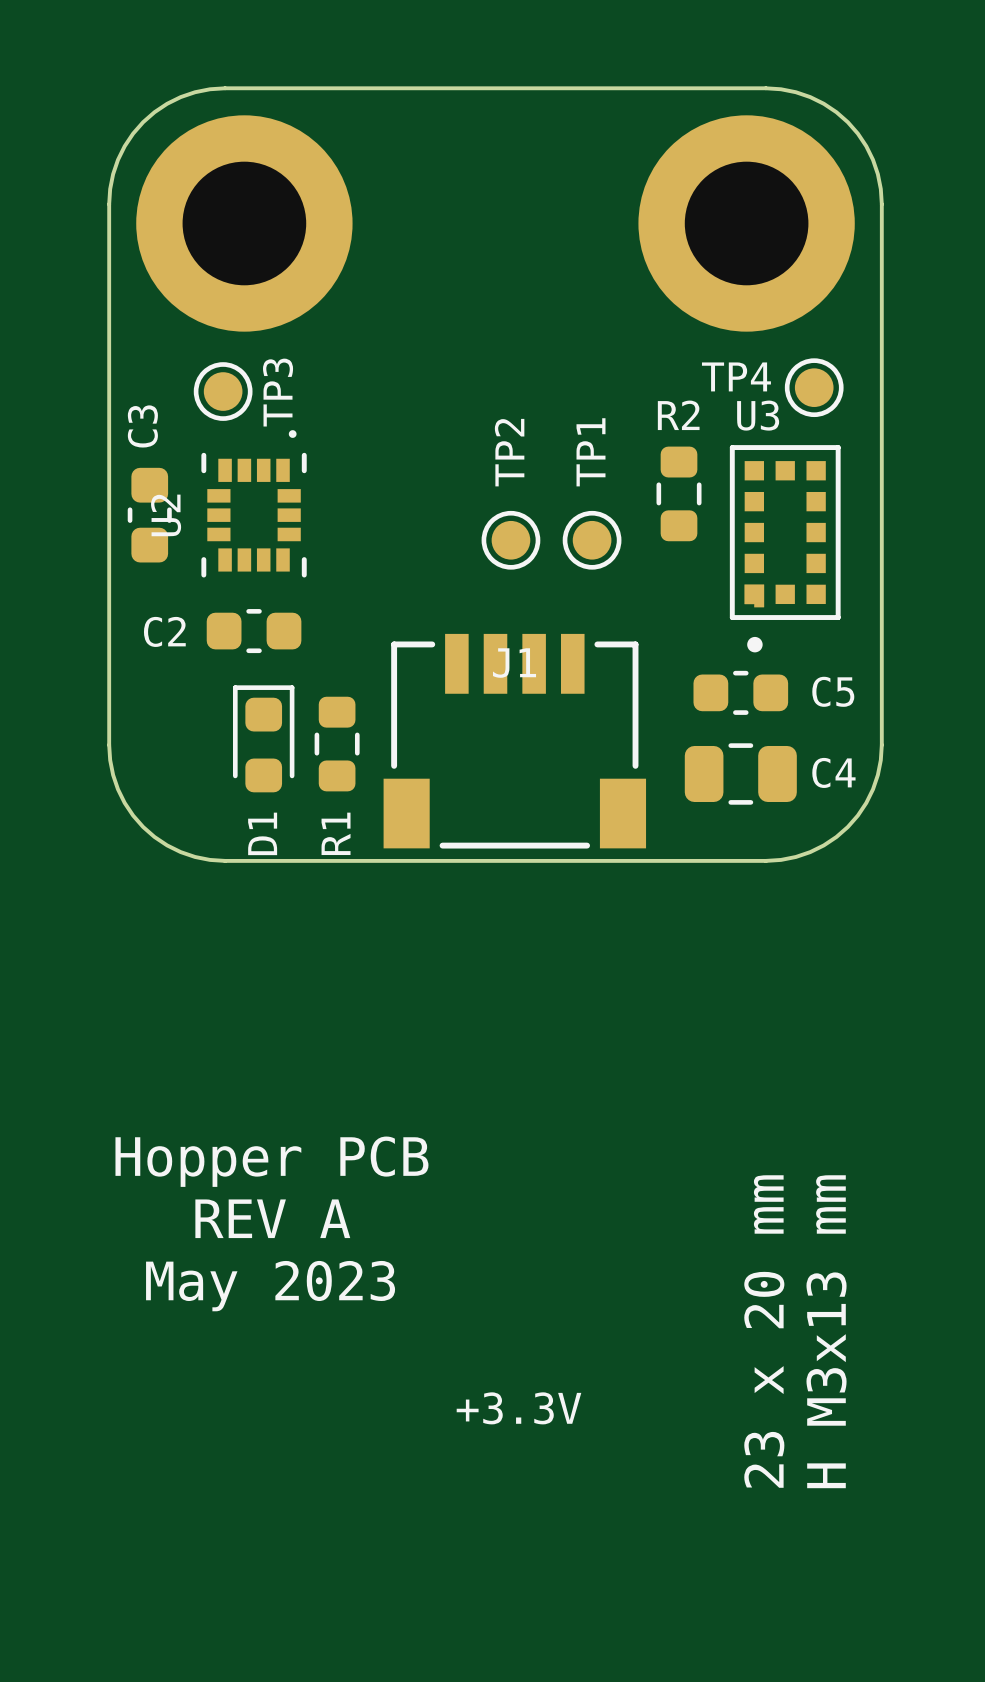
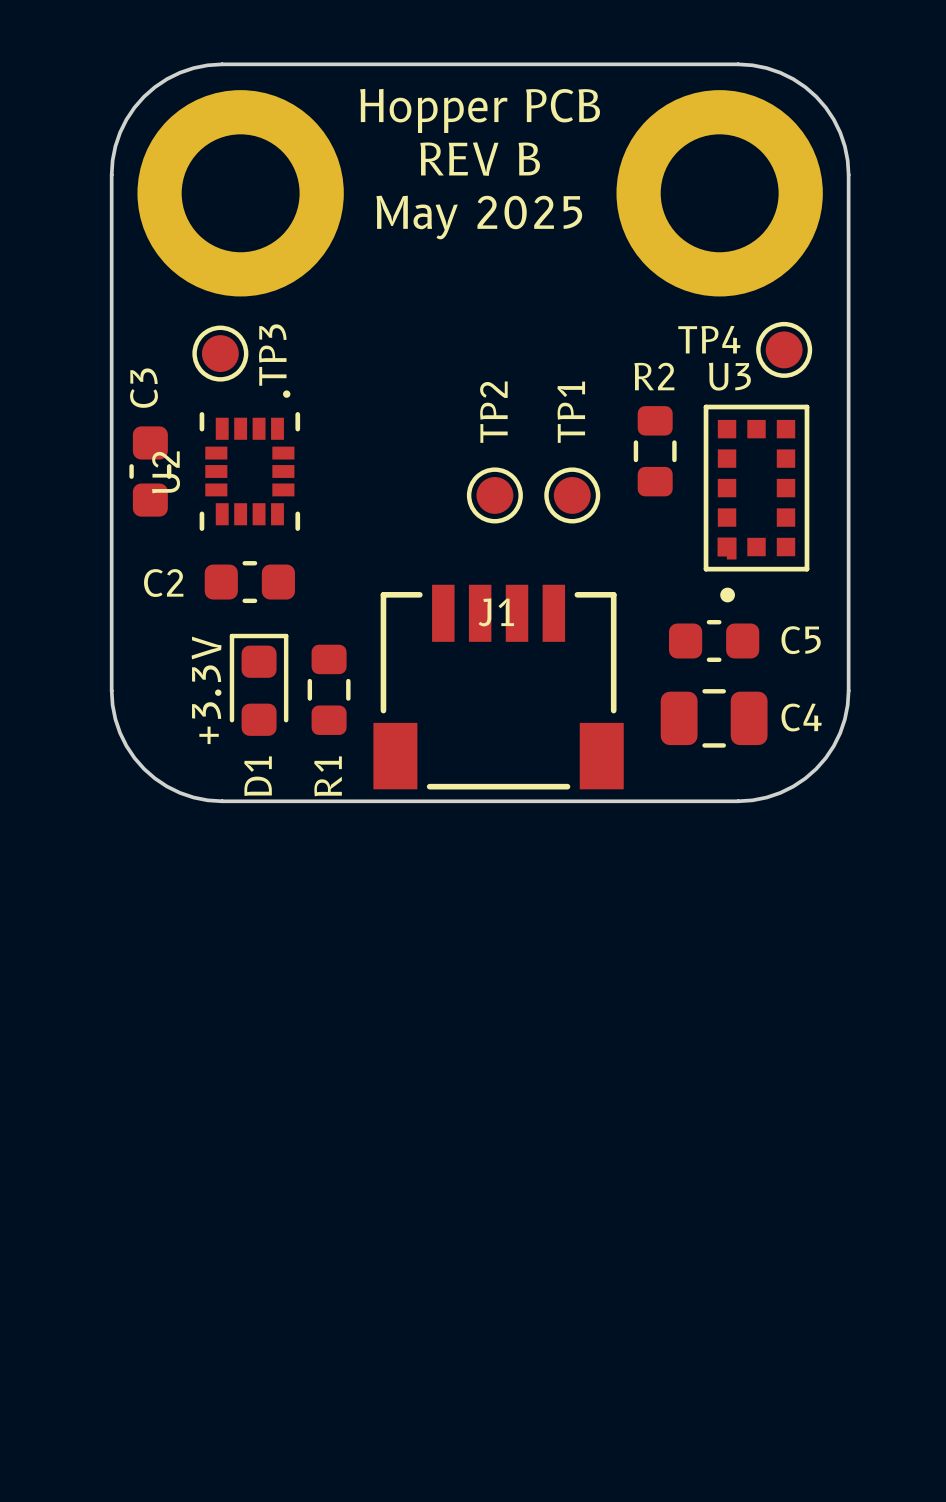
text: none -> Hopper PCB (480, 110)
text: none -> REV B (480, 159)
text: none -> May 2025 (479, 217)
text: Hopper PCB (271, 1161) -> none
text: REV A (272, 1218) -> none
text: May 2023 (270, 1286) -> none
text: 23 x 20 mm (764, 1331) -> none
text: H M3x13 mm (826, 1331) -> none
text rotation: 0° (519, 1408) -> 90° counterclockwise (206, 690)
text position: +3.3V (519, 1408) -> +3.3V (206, 690)

